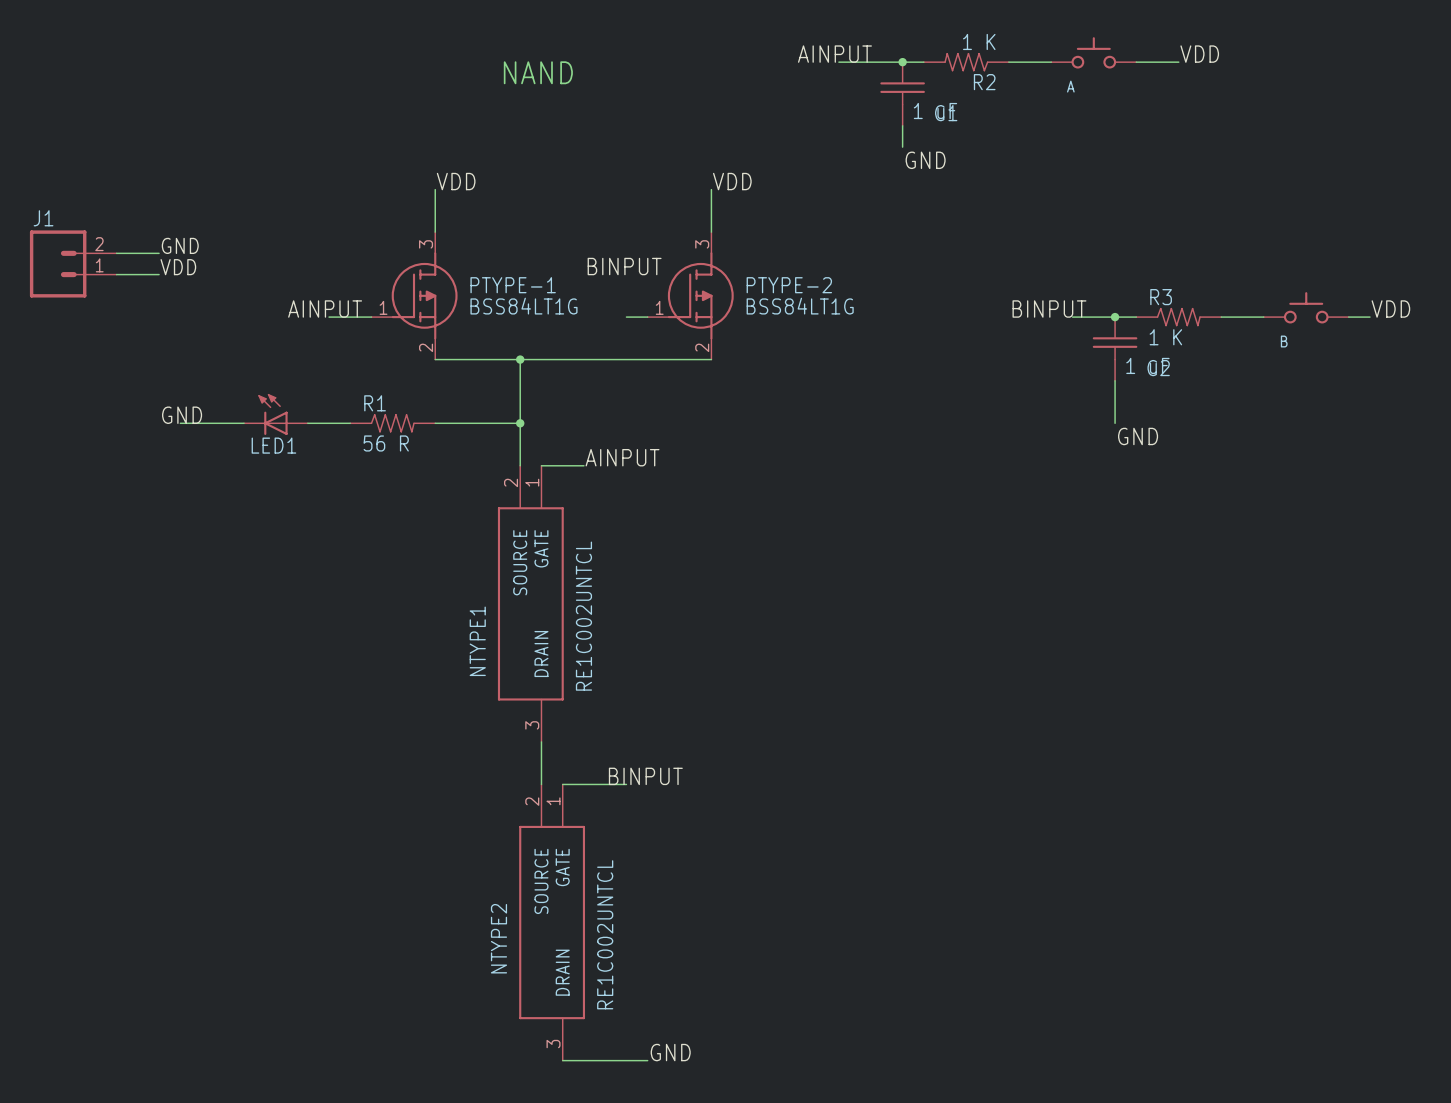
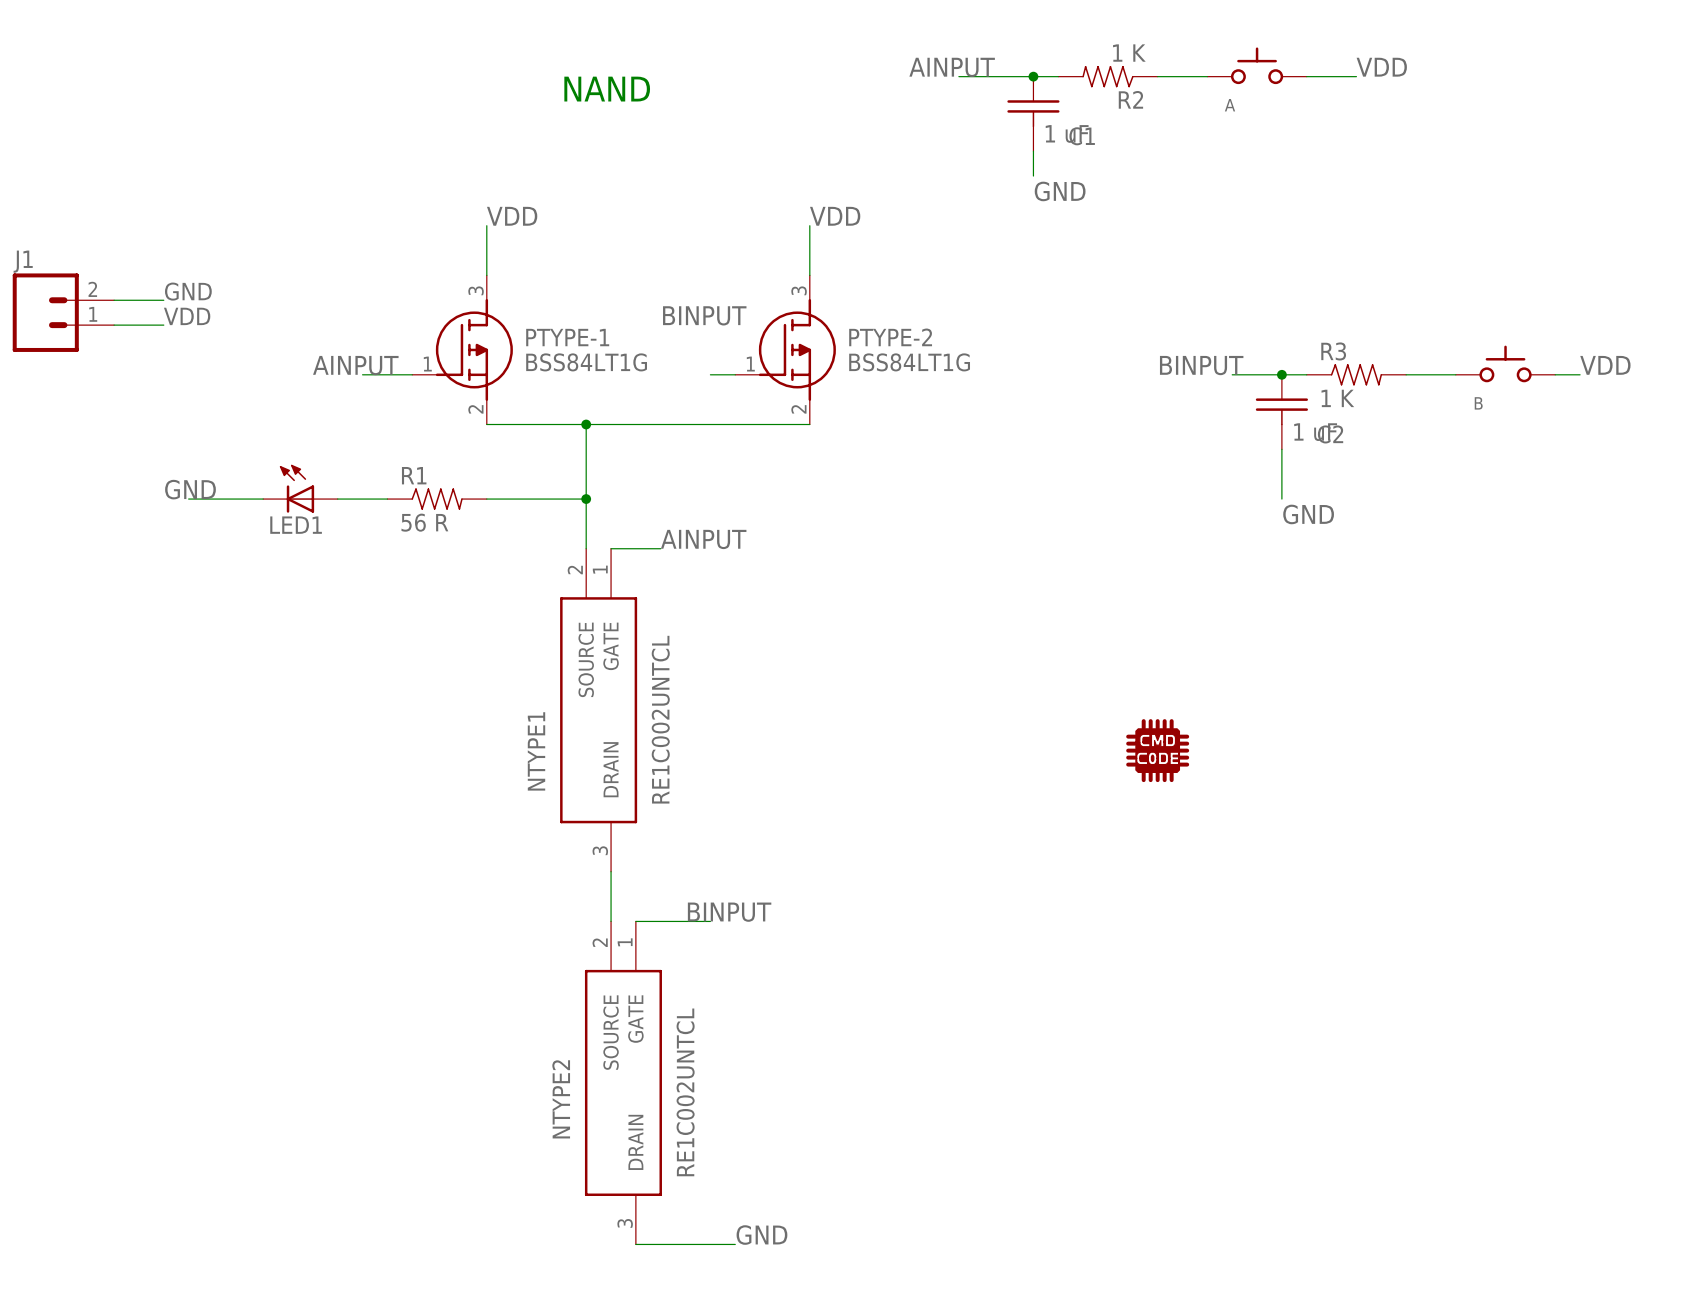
part: none -> (1157, 750)

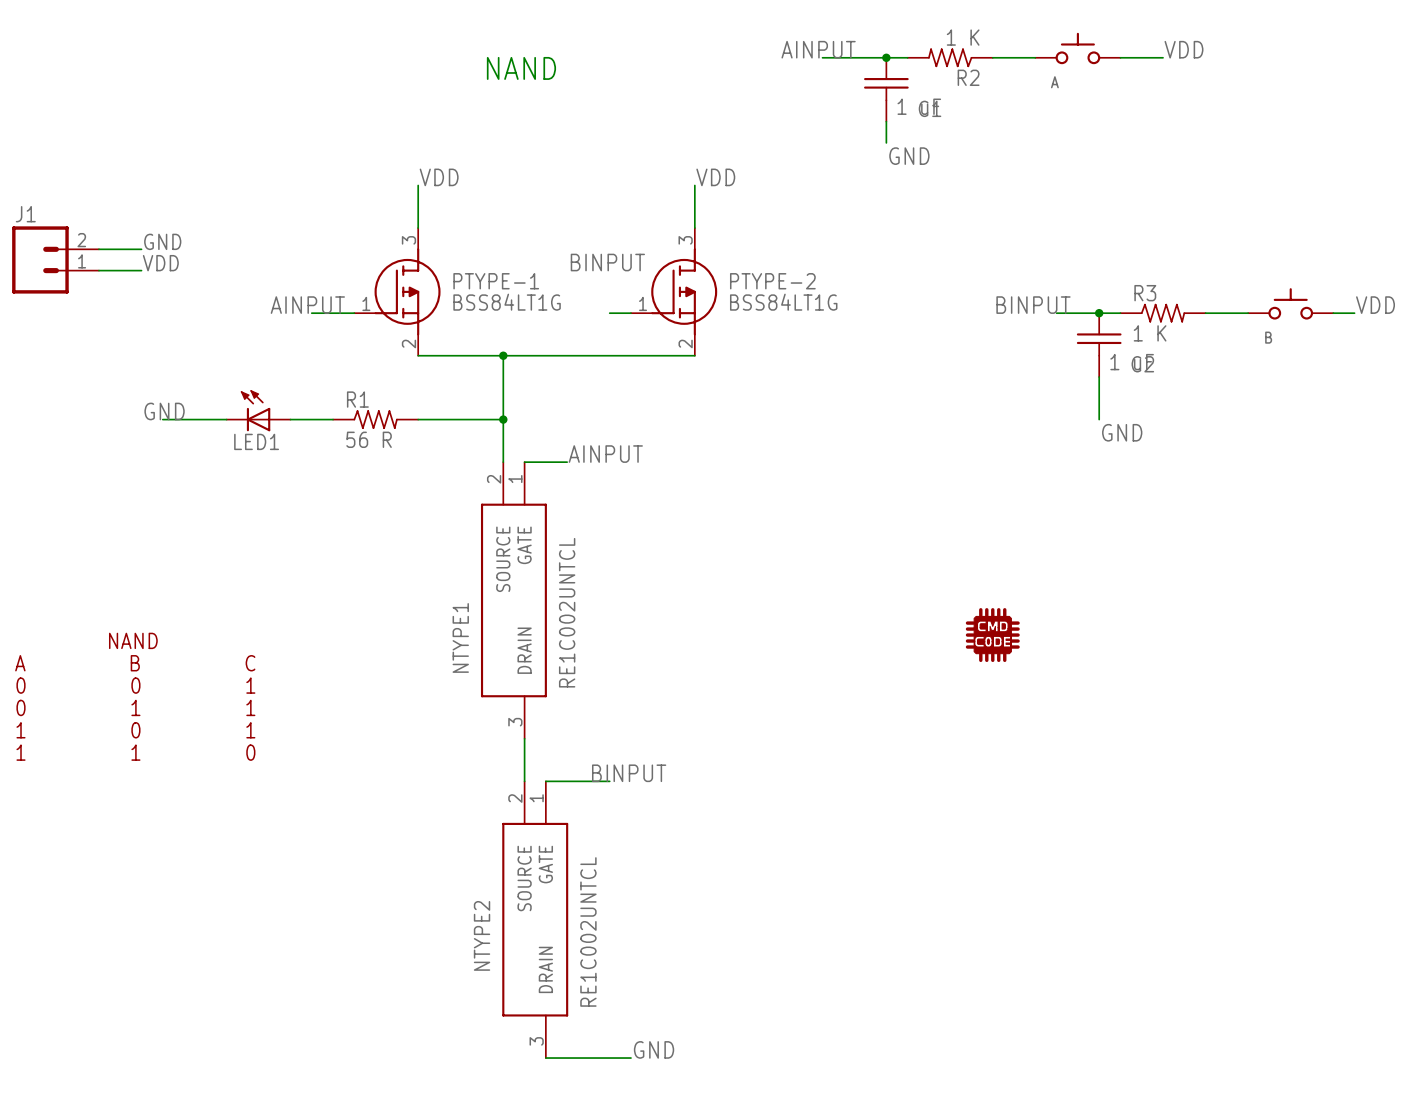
part: none -> (135, 696)

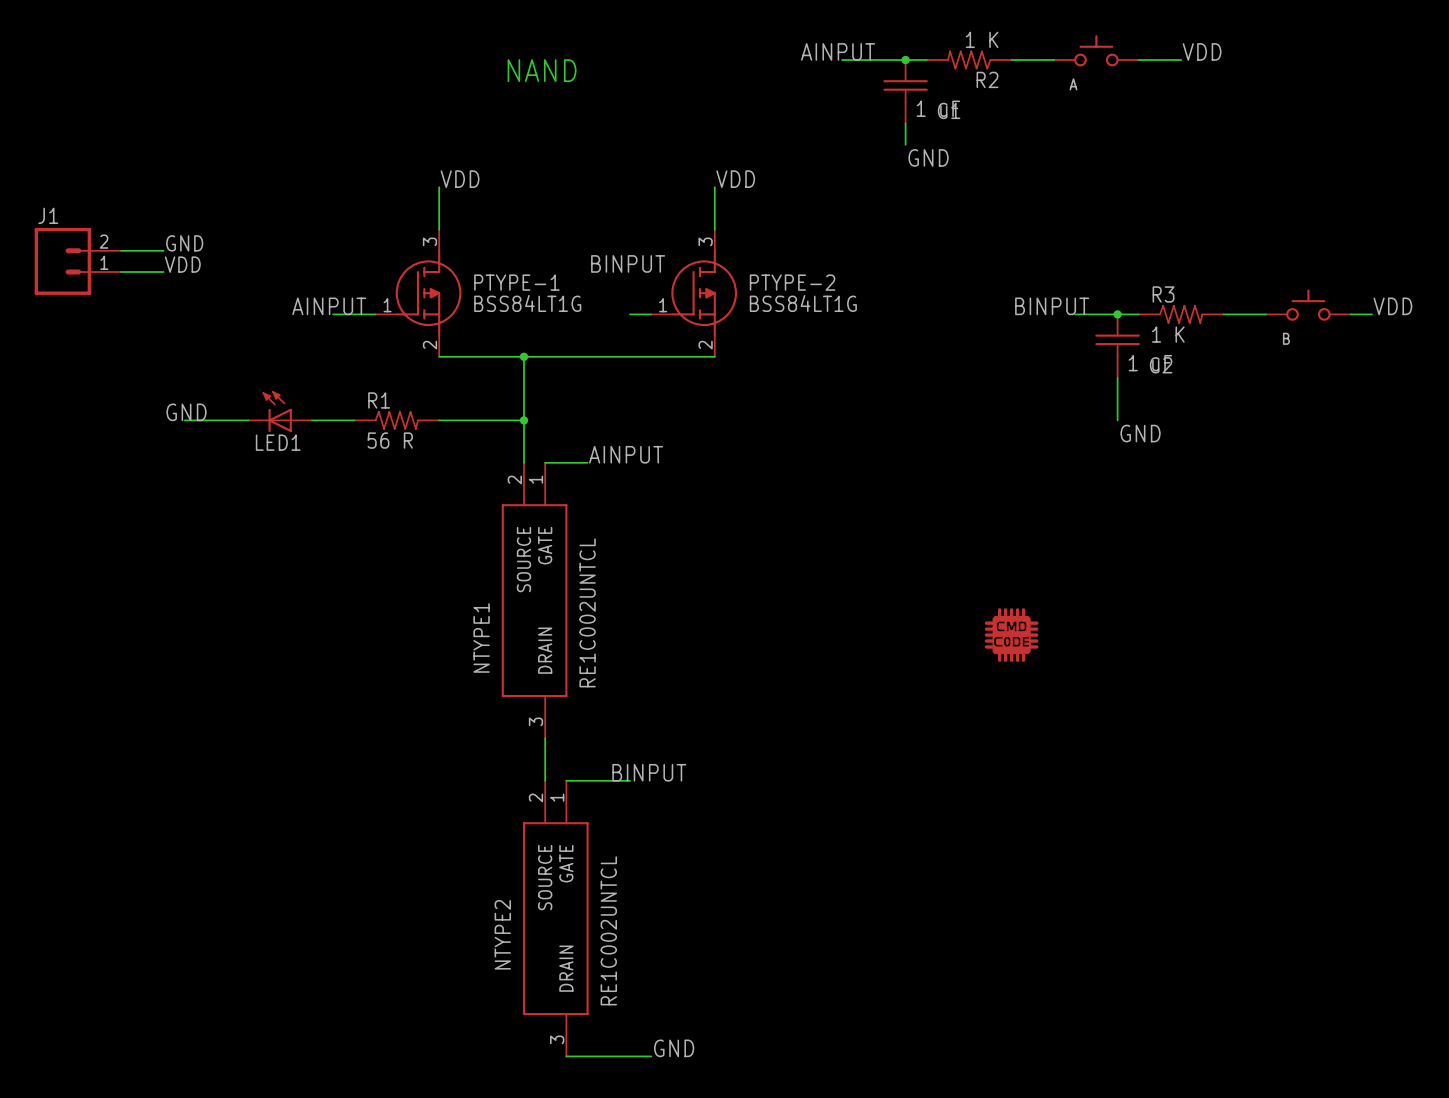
part: (135, 696) -> none

